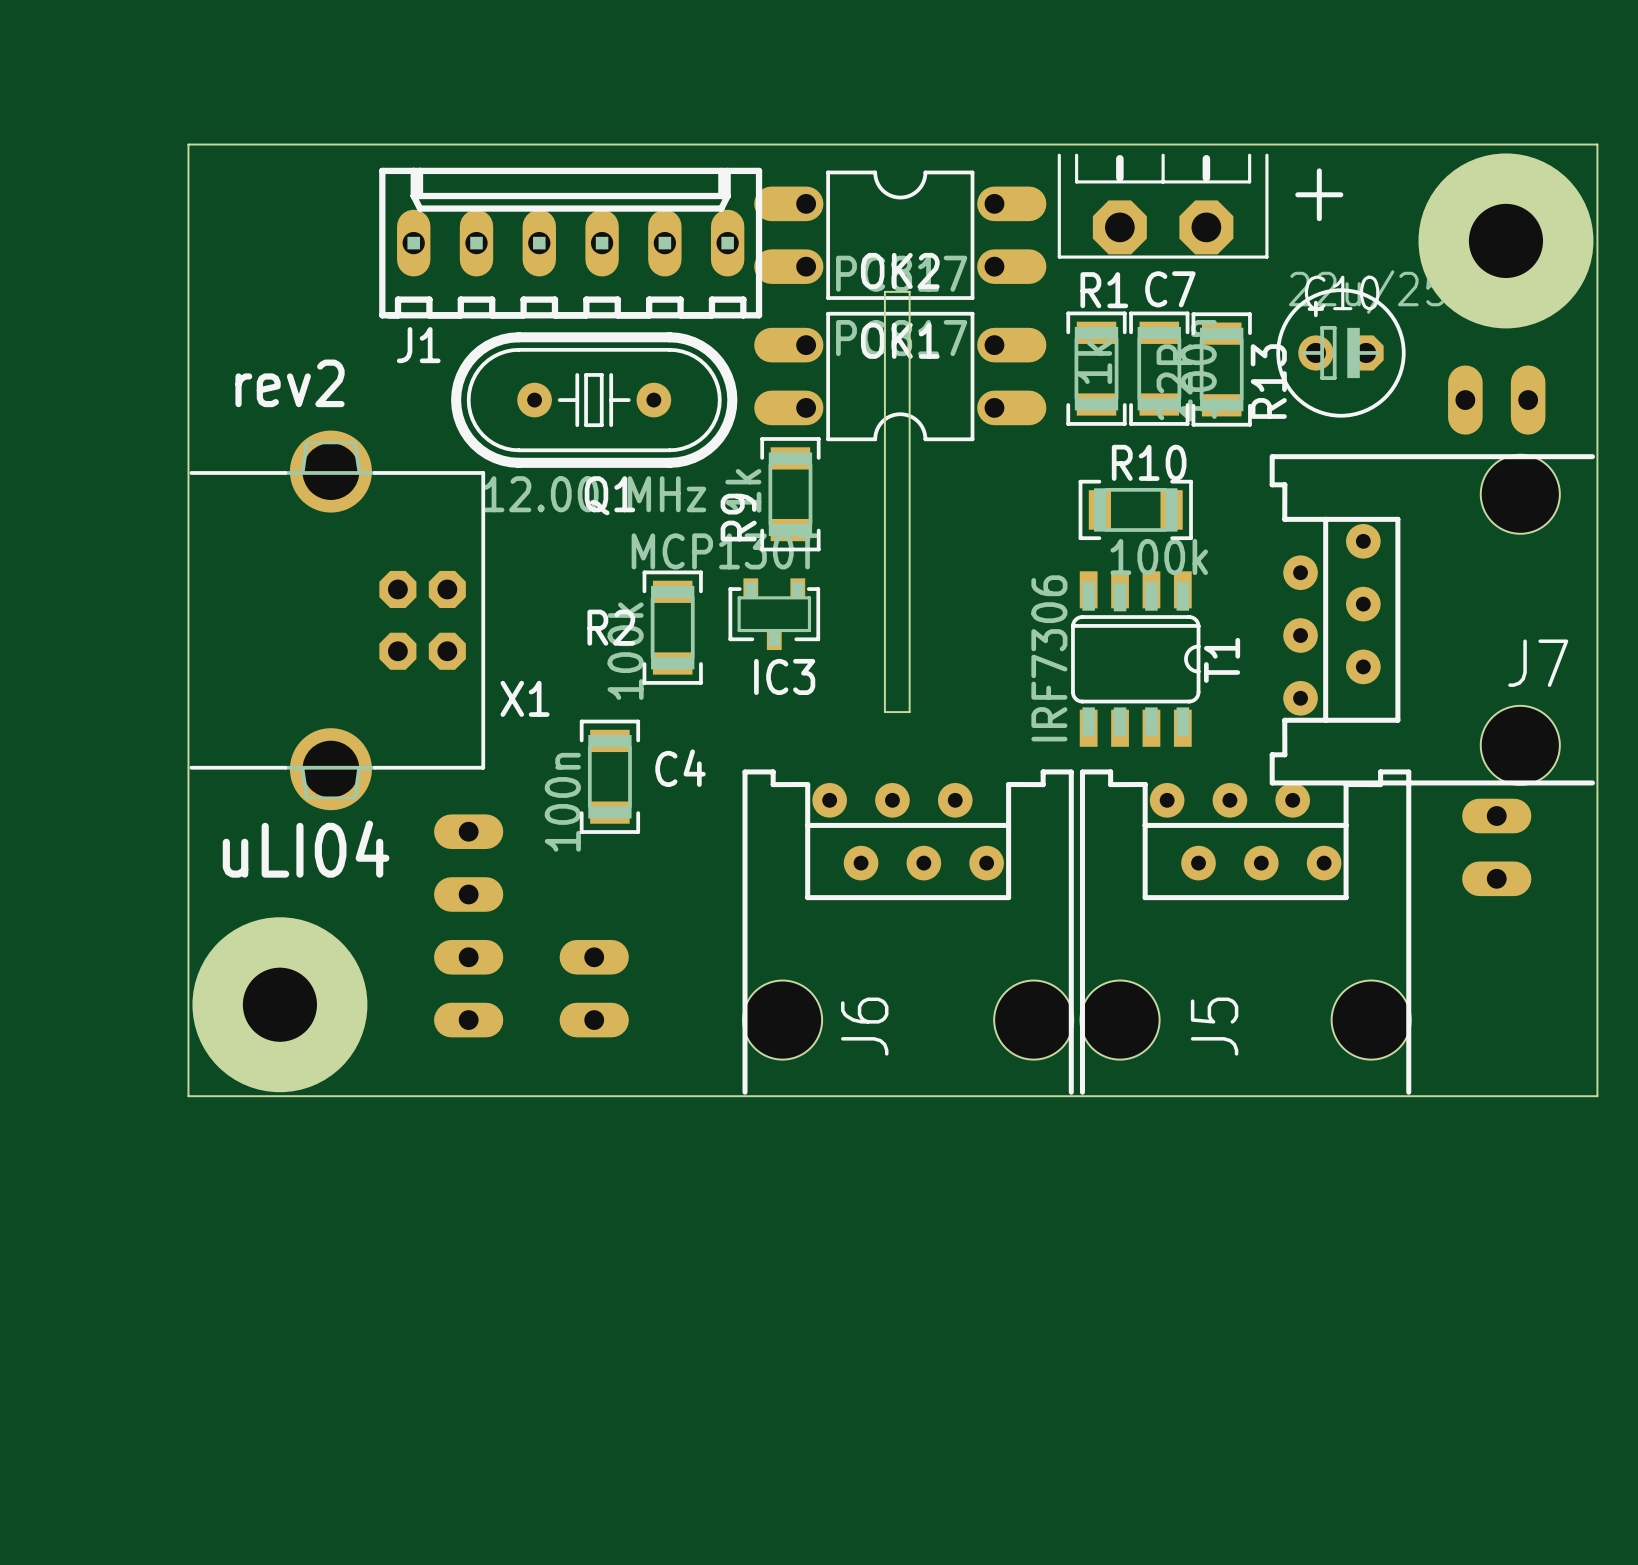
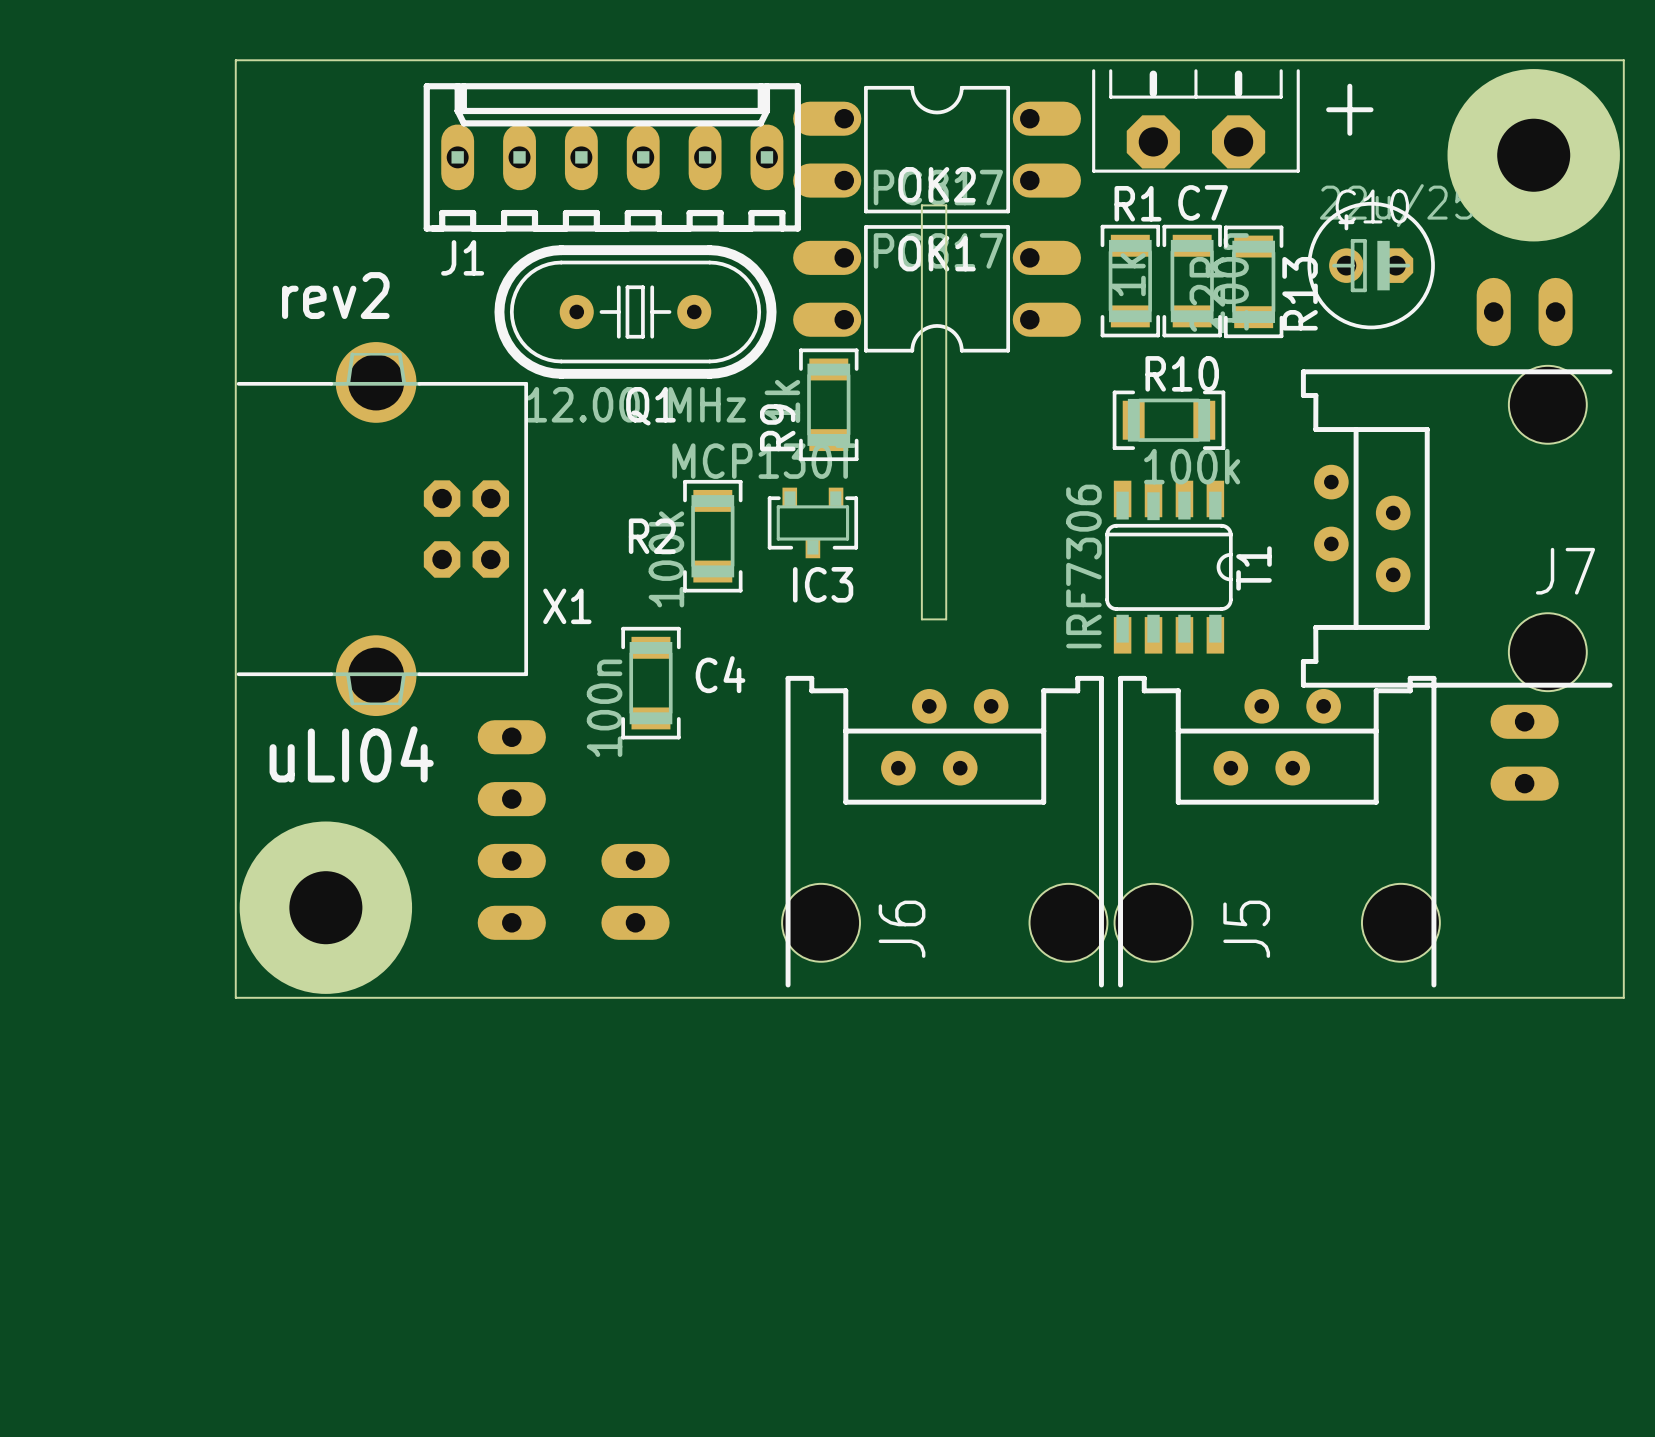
J7 footprint: [1269, 454, 1595, 786] -> [1300, 365, 1613, 692]
J6 footprint: [742, 769, 1074, 1095] -> [782, 675, 1108, 988]
J5 footprint: [1079, 769, 1412, 1095] -> [1114, 675, 1440, 988]

